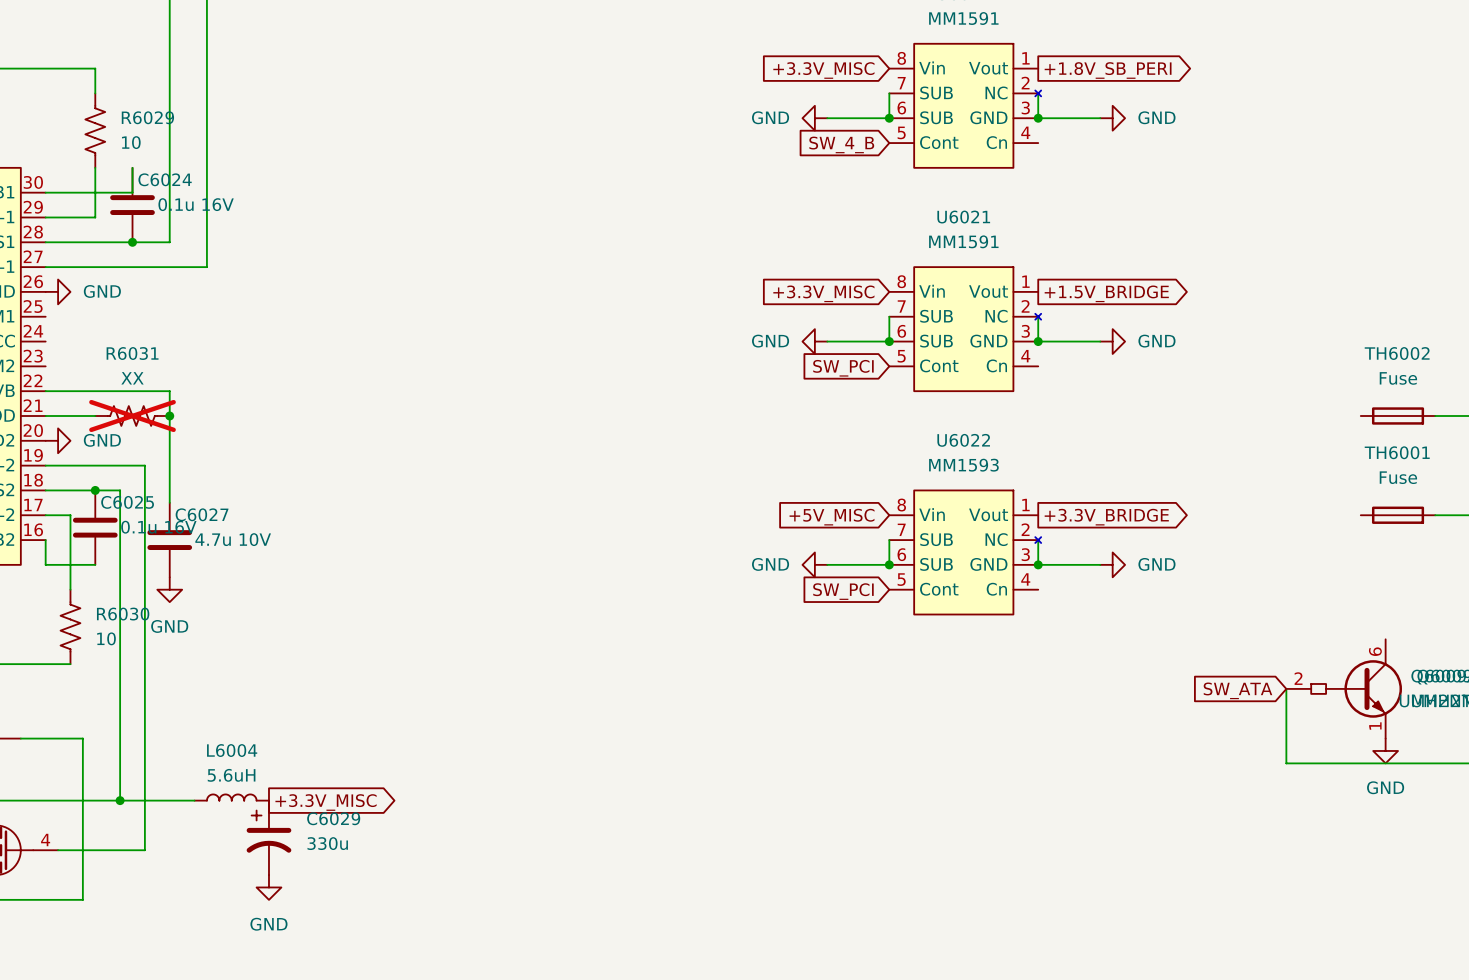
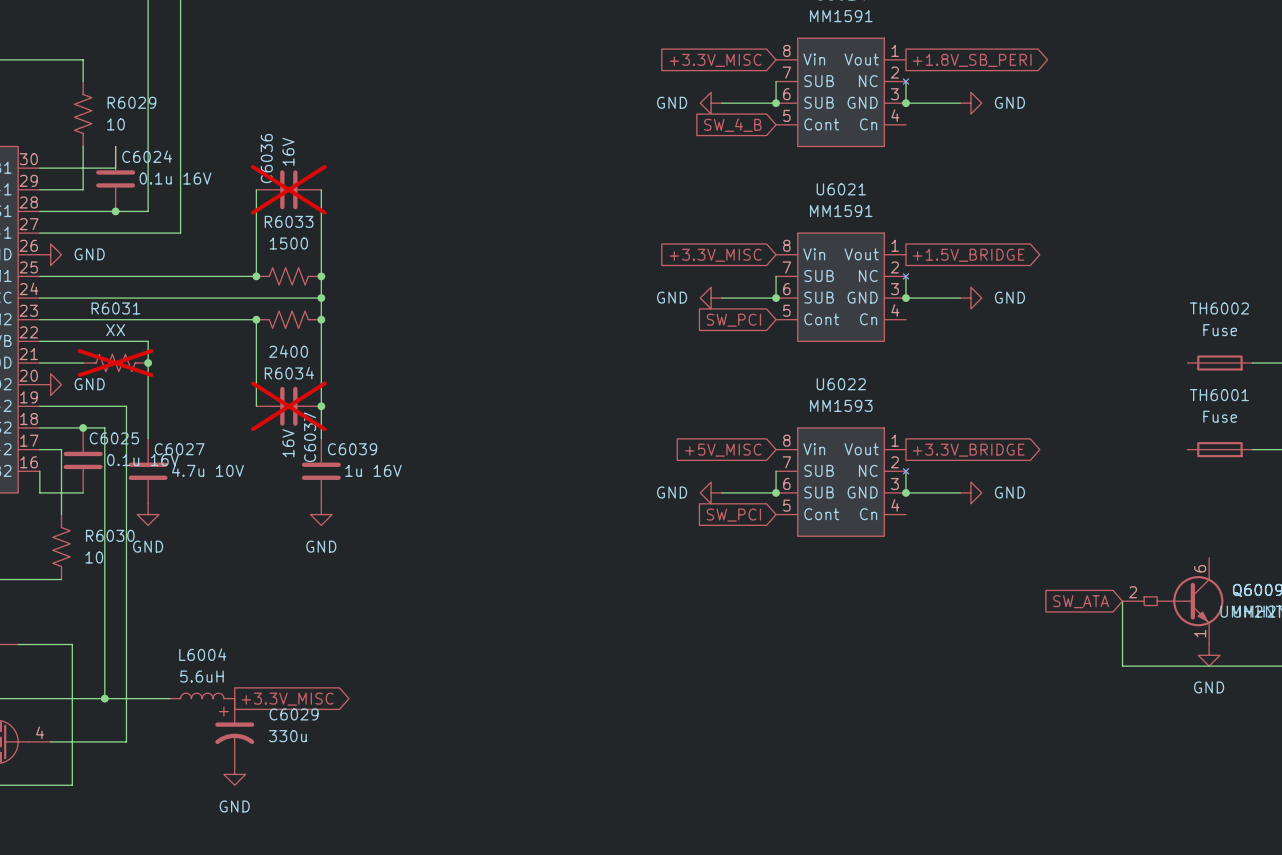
wire: none -> (256, 189) (256, 276) (39, 276)
C6036: none -> 16V (288, 189)
wire: none -> (321, 189) (321, 438)
junction: none -> (256, 276)
R6033: none -> 1500 (288, 276)
junction: none -> (321, 276)
wire: none -> (39, 298) (321, 298)
junction: none -> (321, 298)
wire: none -> (39, 319) (256, 319) (256, 406)
junction: none -> (256, 319)
R6034: none -> 2400 (288, 319)
junction: none -> (321, 319)
C6037: none -> 16V (288, 406)
junction: none -> (321, 406)
C6039: none -> 1u 16V (321, 471)
power symbol: none -> GND (321, 514)

